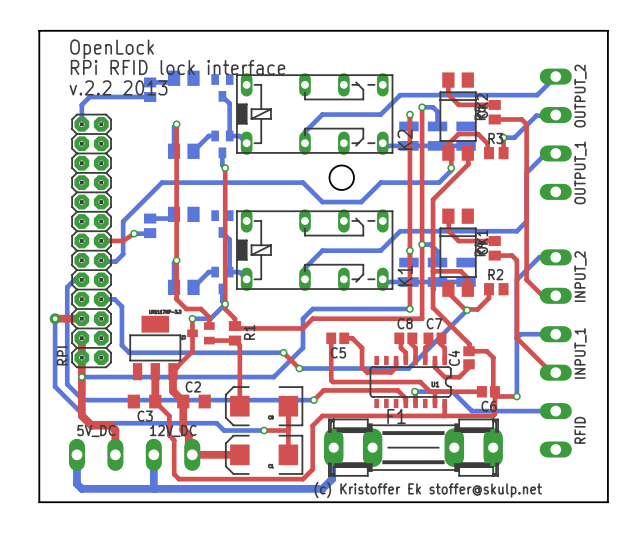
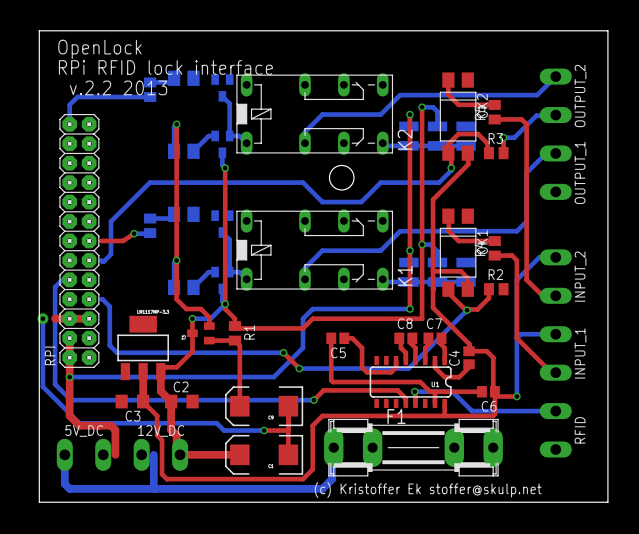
text position: OpenLock (112, 49) -> OpenLock (99, 49)
text position: RPi RFID lock interface (178, 67) -> RPi RFID lock interface (165, 67)
bottom track: (89, 96) (81, 104) (81, 124) -> (89, 96) (77, 96) (69, 104) (69, 124)
bottom track: (162, 182) (123, 221) (123, 254) (115, 261) (103, 261) -> (162, 182) (149, 182) (111, 221) (111, 254) (103, 261)
RPI position: (91, 240) -> (79, 240)
bottom track: none -> (69, 279) (62, 279) (55, 287) (55, 318)
bottom track: (81, 279) (74, 279) (67, 287) (67, 384) (83, 400) -> none
bottom track: (102, 299) (114, 299) (121, 306) (121, 345) (129, 352) -> (102, 299) (109, 306) (109, 345) (117, 352) (129, 352)
bottom track: none -> (42, 318) (42, 386) (79, 423) (91, 423)
via position: (55, 318) -> (42, 318)
top track: (81, 338) (81, 415) (91, 425) -> (69, 338) (69, 415) (79, 425) (91, 425)
part position: (155, 347) -> (143, 347)
top track: (176, 367) (172, 371) (172, 391) (183, 401) (183, 429) (188, 435) (188, 451) (192, 454) -> (176, 367) (165, 367) (160, 371) (160, 391) (171, 401) (171, 429) (176, 435) (176, 451) (180, 454) (192, 454)
top track: (155, 371) (155, 401) (169, 415) (169, 435) (174, 440) (174, 474) (179, 479) -> (143, 371) (143, 401) (157, 415) (157, 435) (162, 440) (162, 474) (166, 479) (179, 479)
bottom track: none -> (69, 377) (81, 377)
via position: (81, 377) -> (69, 377)
bottom track: (55, 384) (55, 386) (91, 423) -> (55, 384) (70, 400) (83, 400)
C3 position: (144, 401) -> (132, 401)
C2 position: (193, 401) -> (181, 401)
bottom track: (76, 454) (76, 484) (81, 488) -> (64, 454) (64, 484) (69, 488) (81, 488)
5V_DC position: (96, 454) -> (84, 454)
12V_DC position: (173, 454) -> (160, 454)

